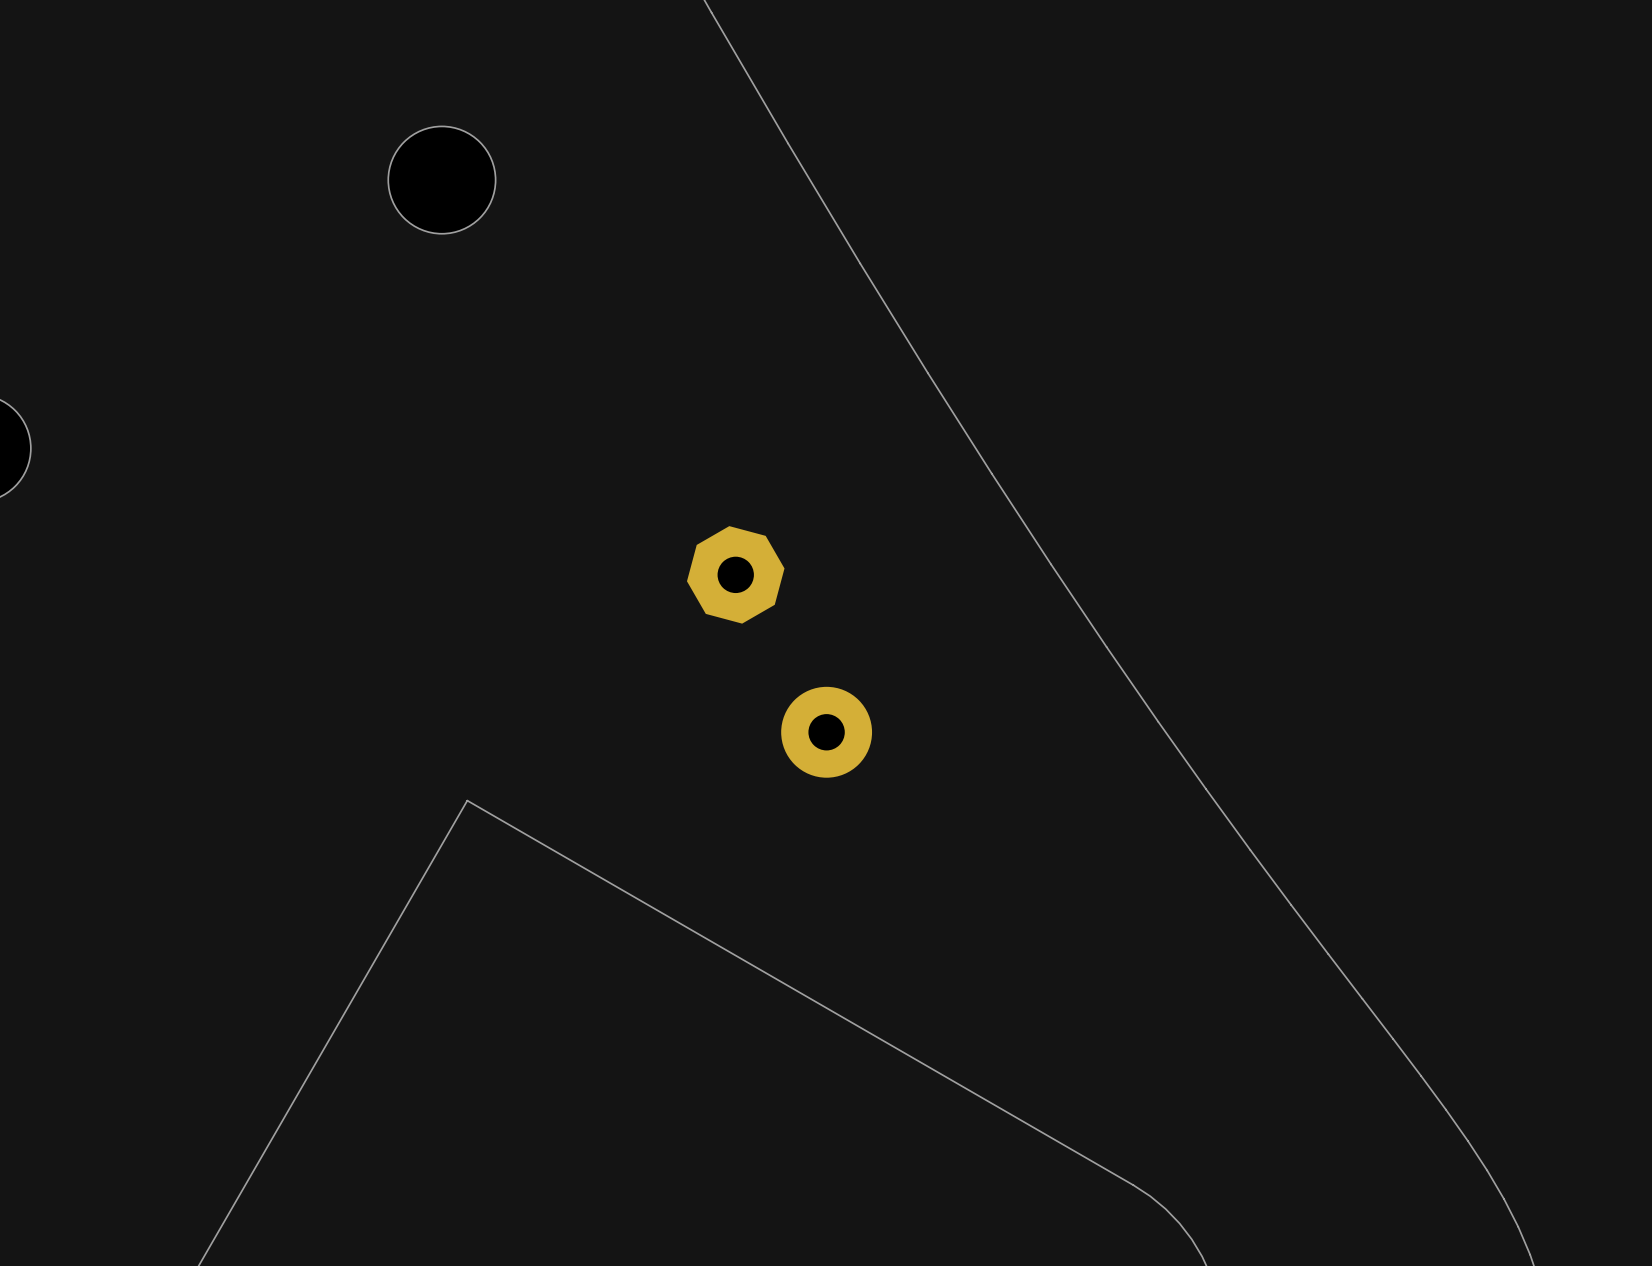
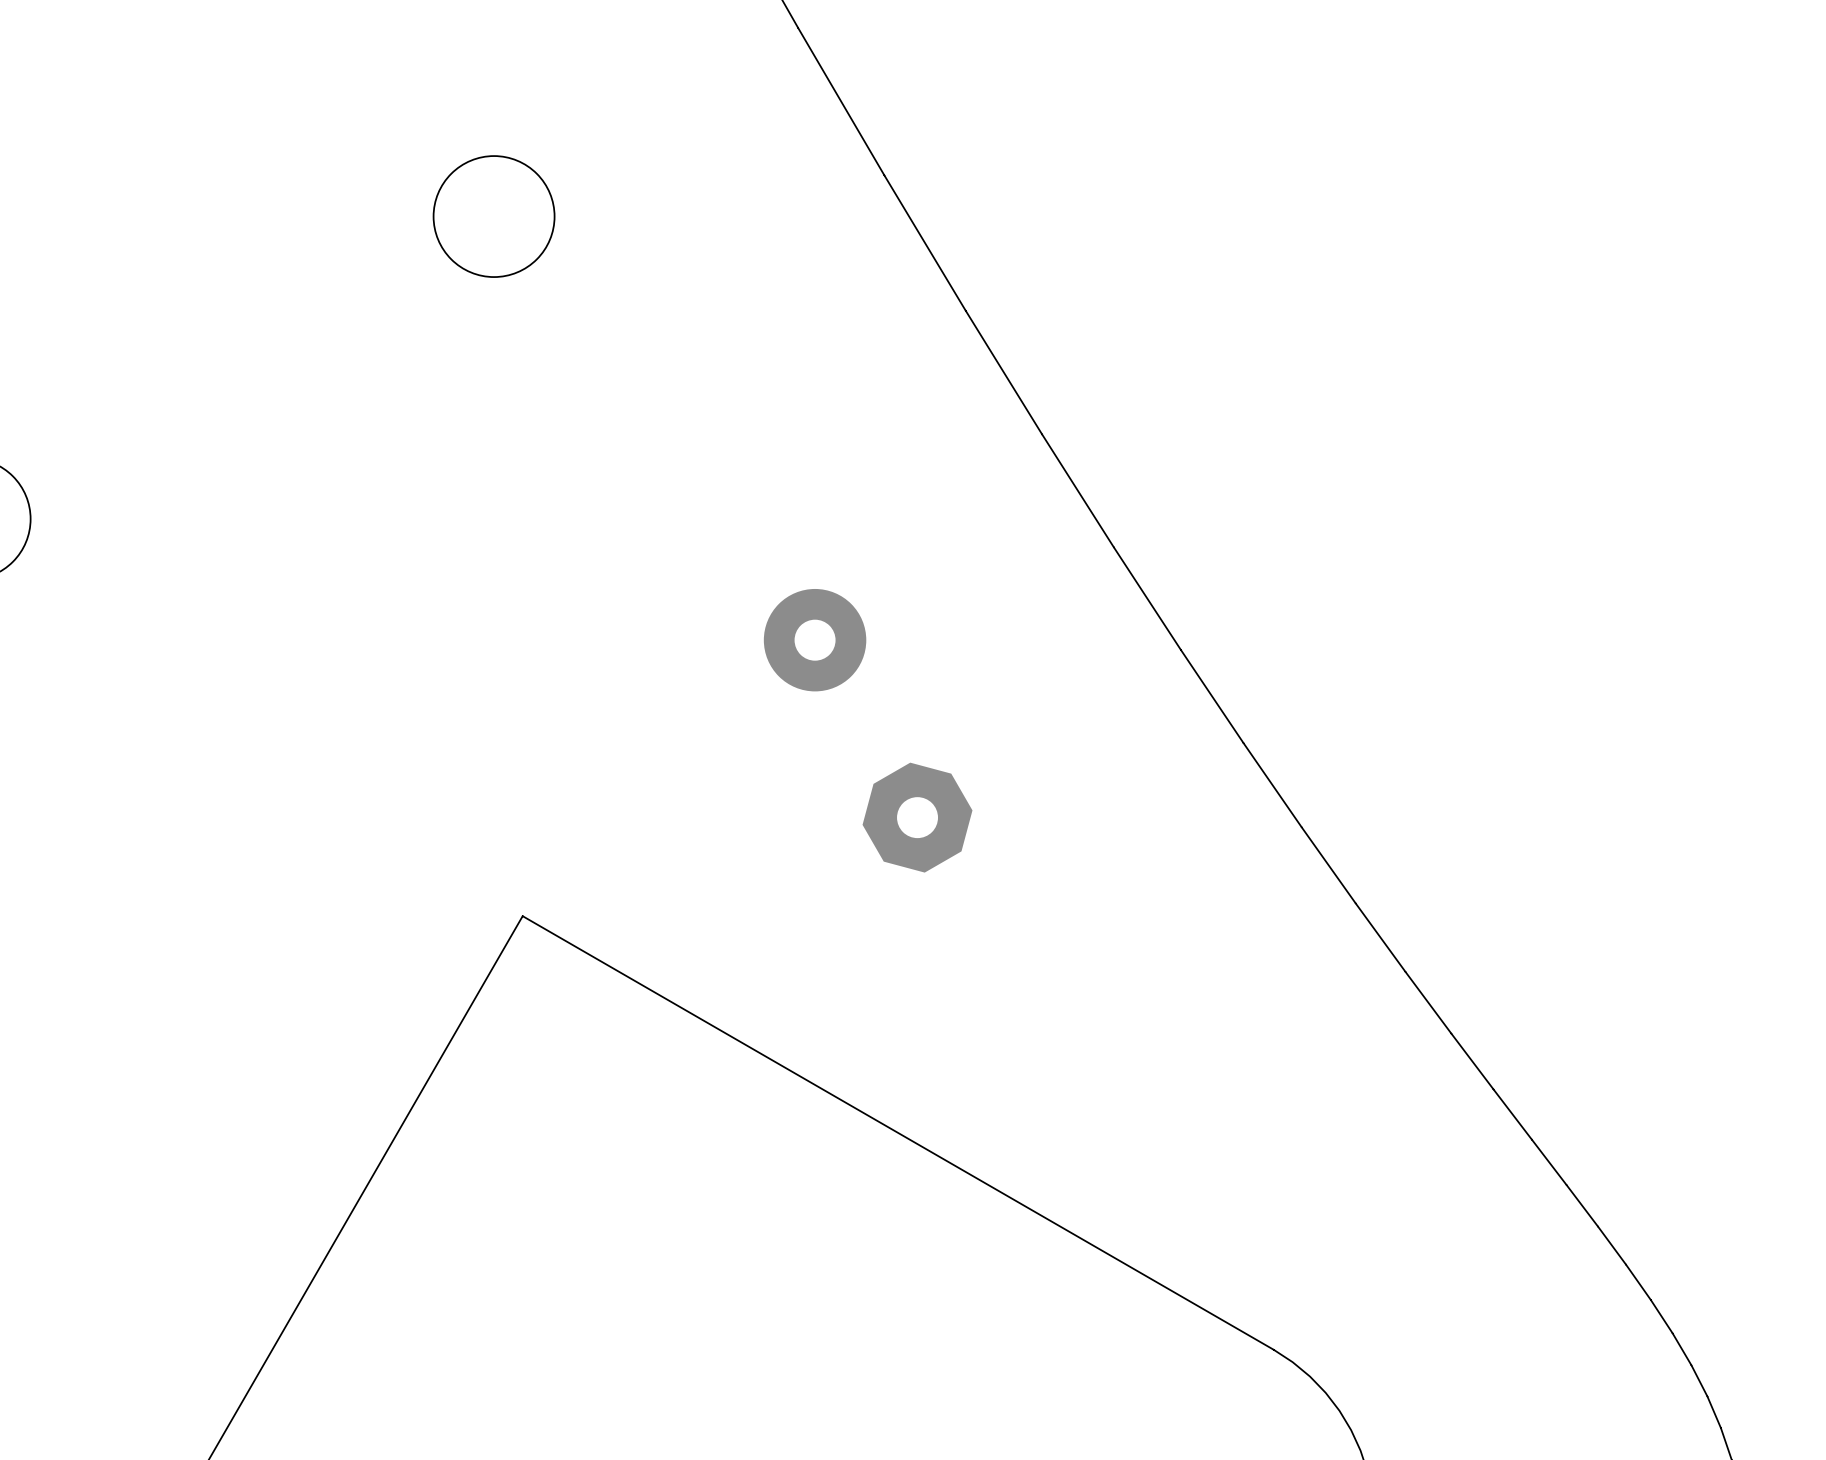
part rotation: 0° (779, 651) -> 180° (868, 730)

